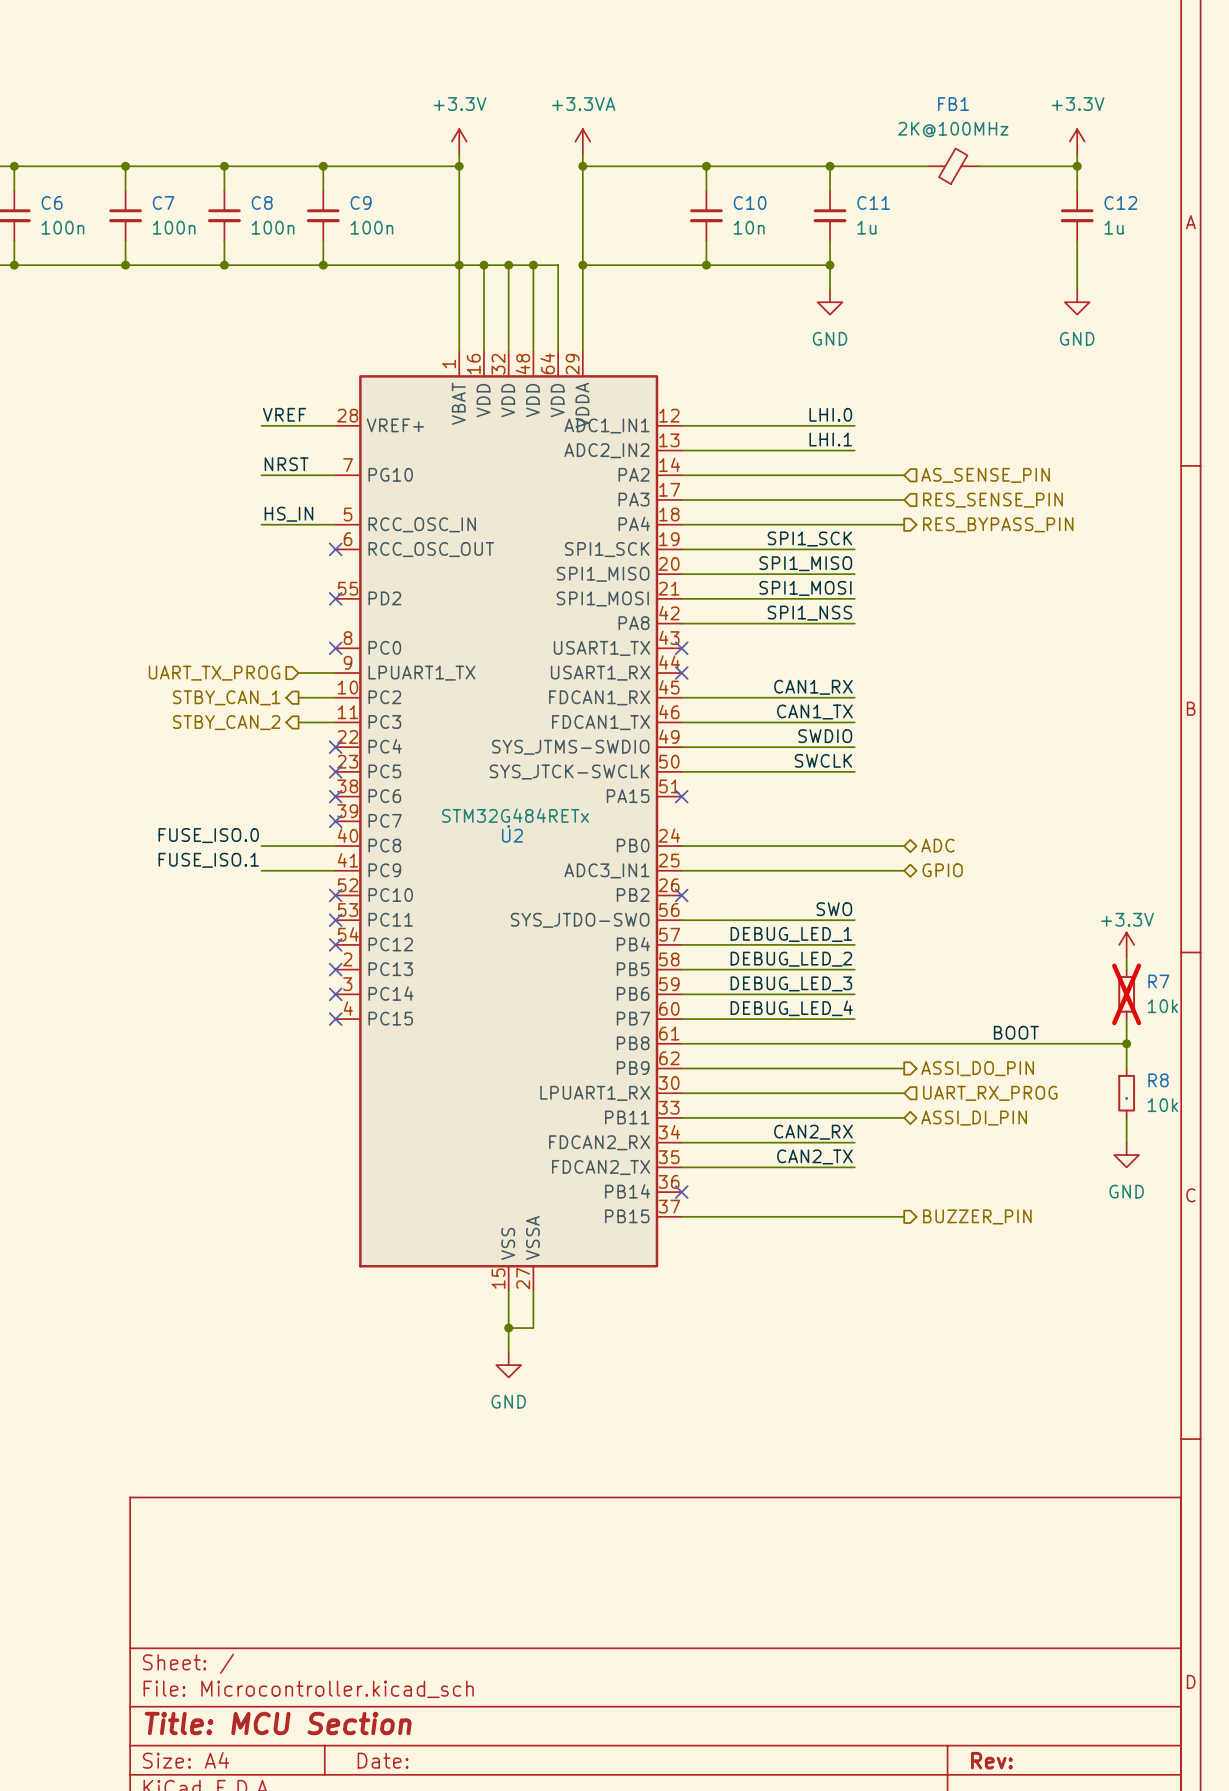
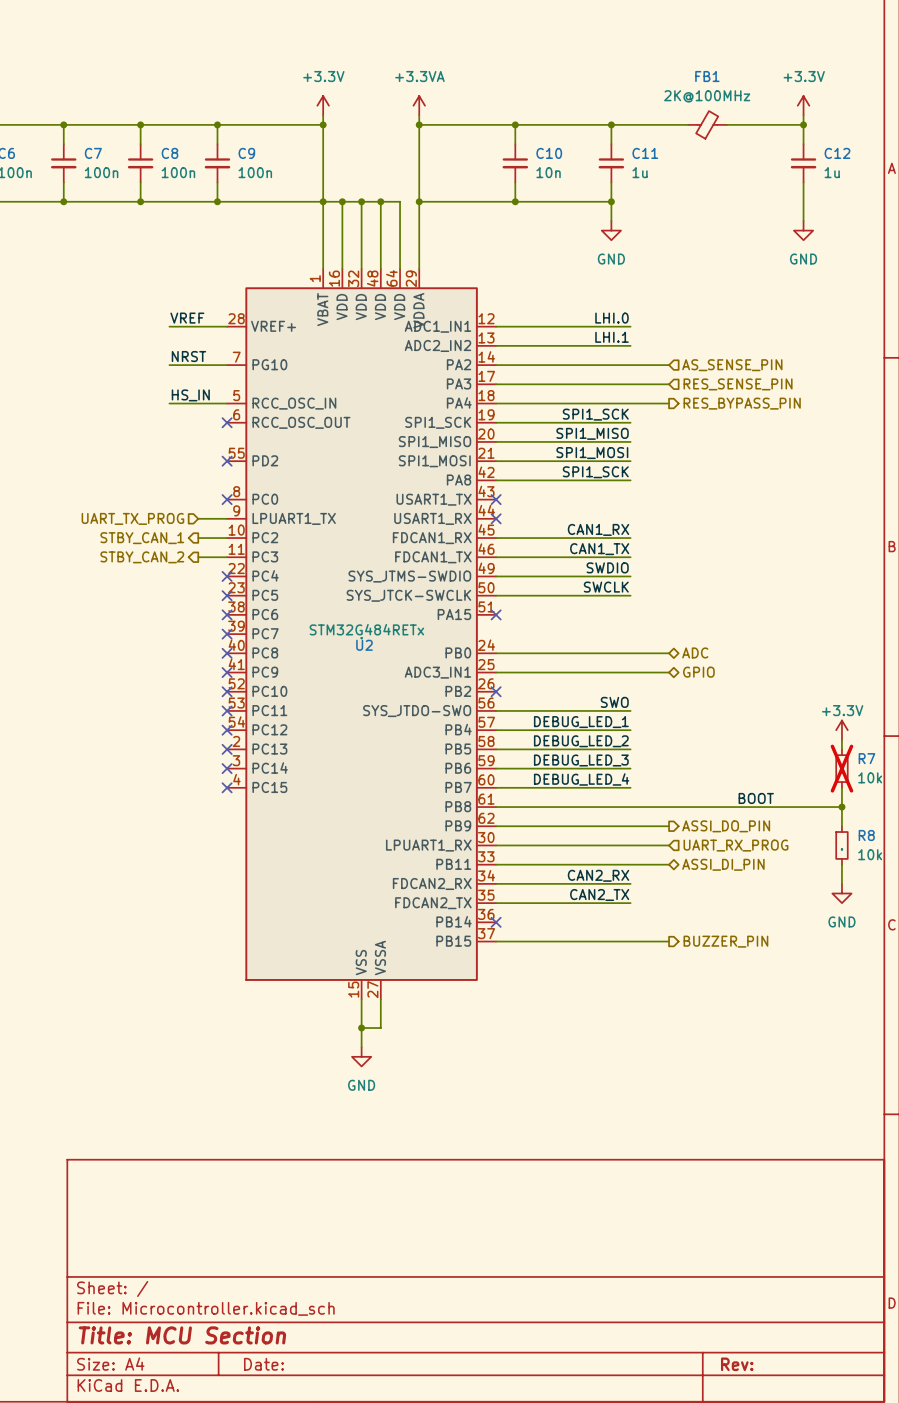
label: SPI1_NSS (809, 613) -> SPI1_SCK (595, 472)
label: FUSE_ISO.0 (208, 835) -> none
wire: (261, 846) (335, 846) -> none
no-connect mark: none -> (227, 653)
label: FUSE_ISO.1 (208, 860) -> none
wire: (261, 870) (335, 870) -> none
no-connect mark: none -> (227, 672)

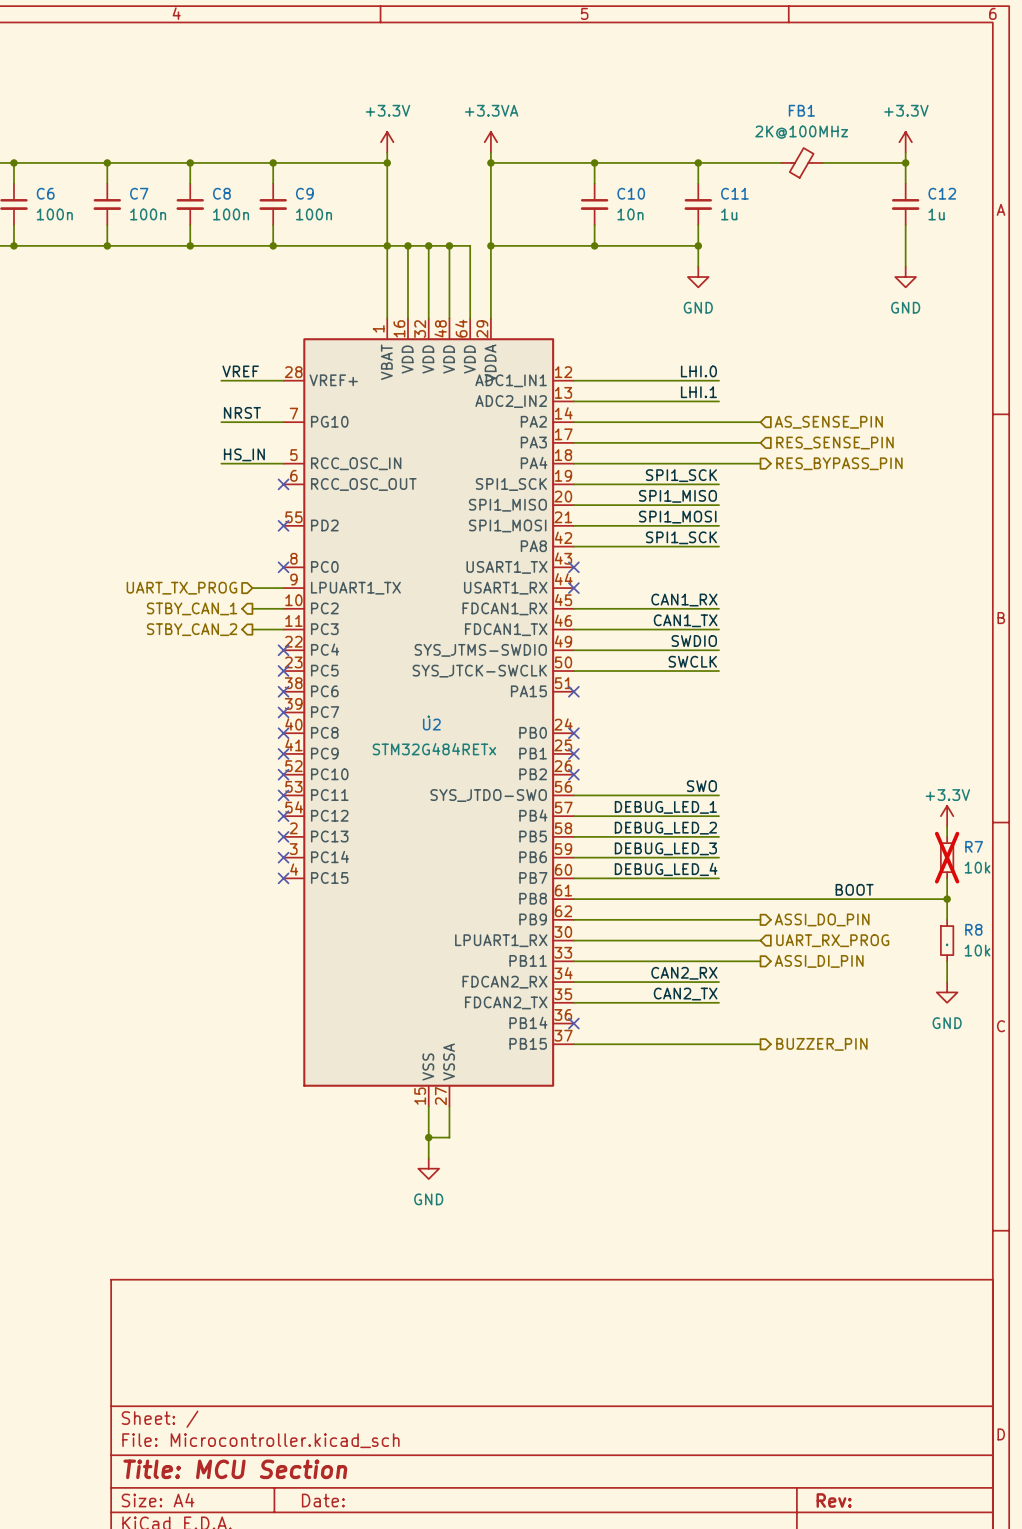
U2 value position: STM32G484RETx (366, 629) -> STM32G484RETx (434, 749)
hierarchical label: ADC (695, 652) -> none
wire: (496, 653) (669, 653) -> none
no-connect mark: none -> (573, 733)
U2 pin name: ADC3_IN1 (437, 672) -> PB1 (533, 753)
wire: (496, 672) (669, 672) -> none
no-connect mark: none -> (573, 753)
hierarchical label: GPIO (698, 672) -> none
hierarchical label shape: bidirectional (723, 864) -> output (819, 961)

